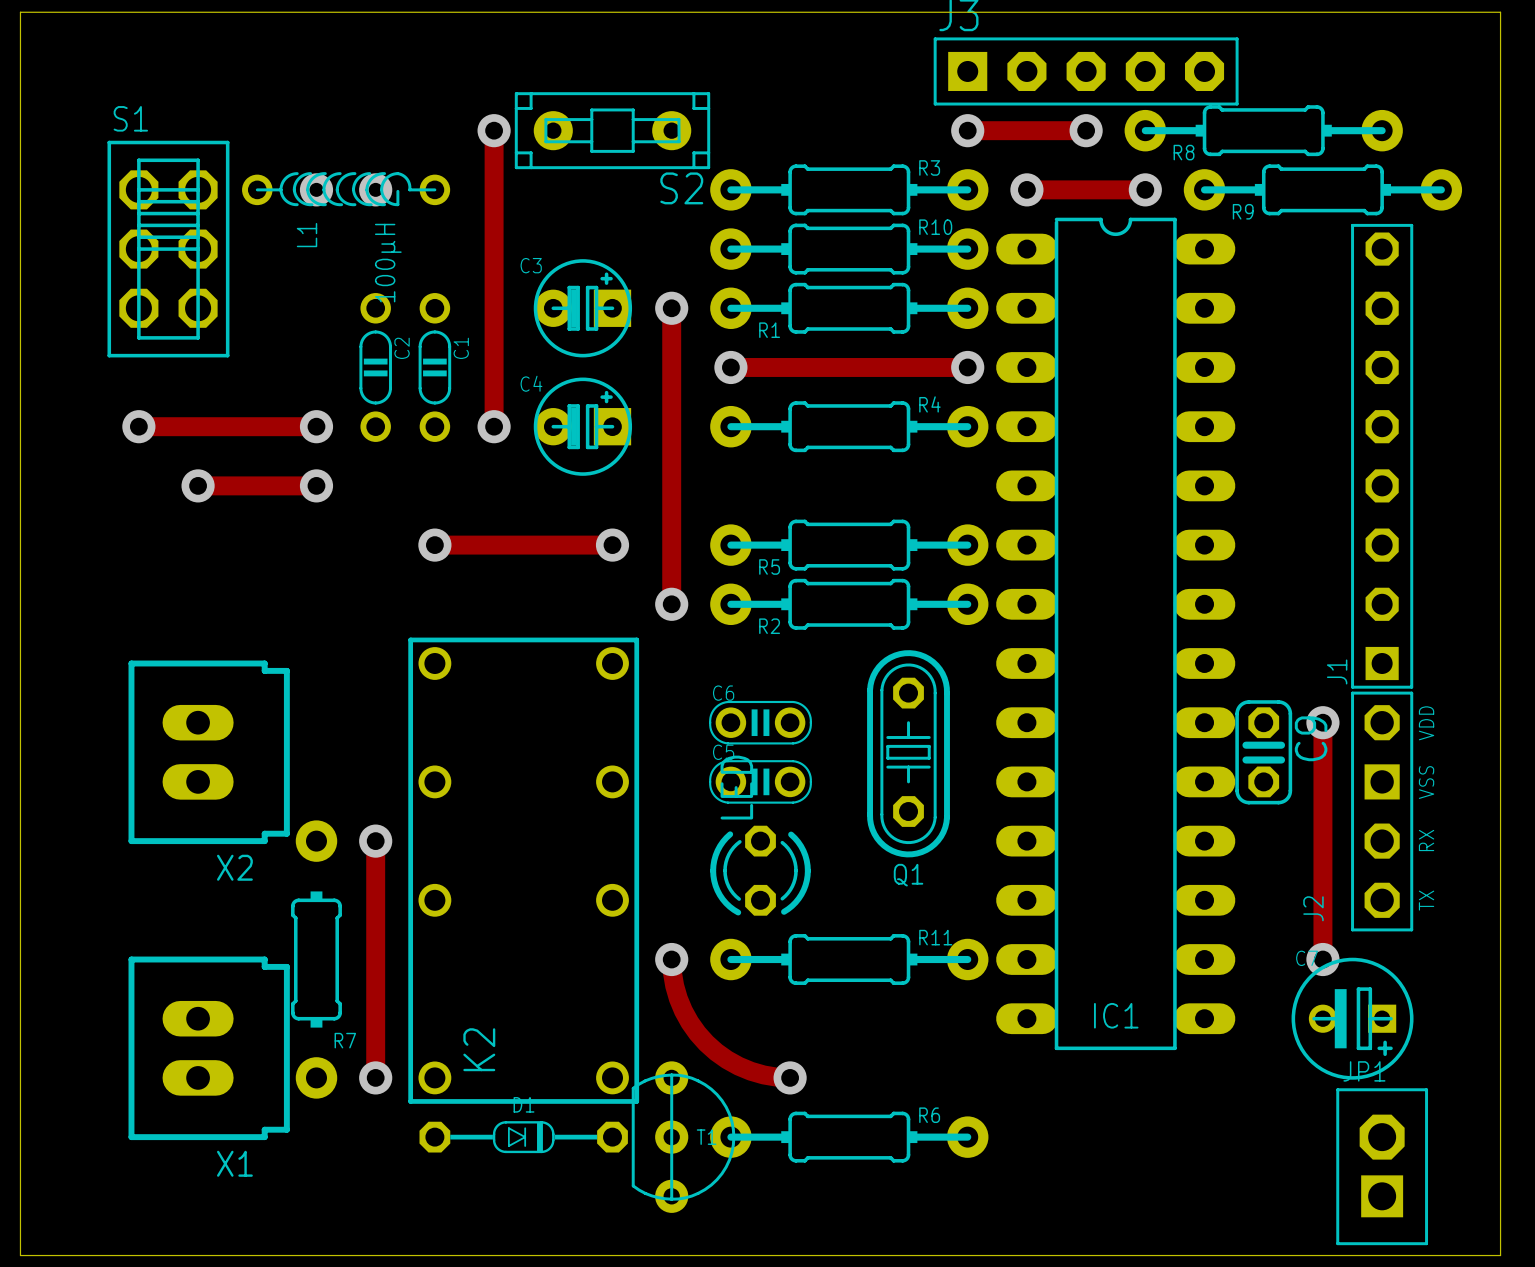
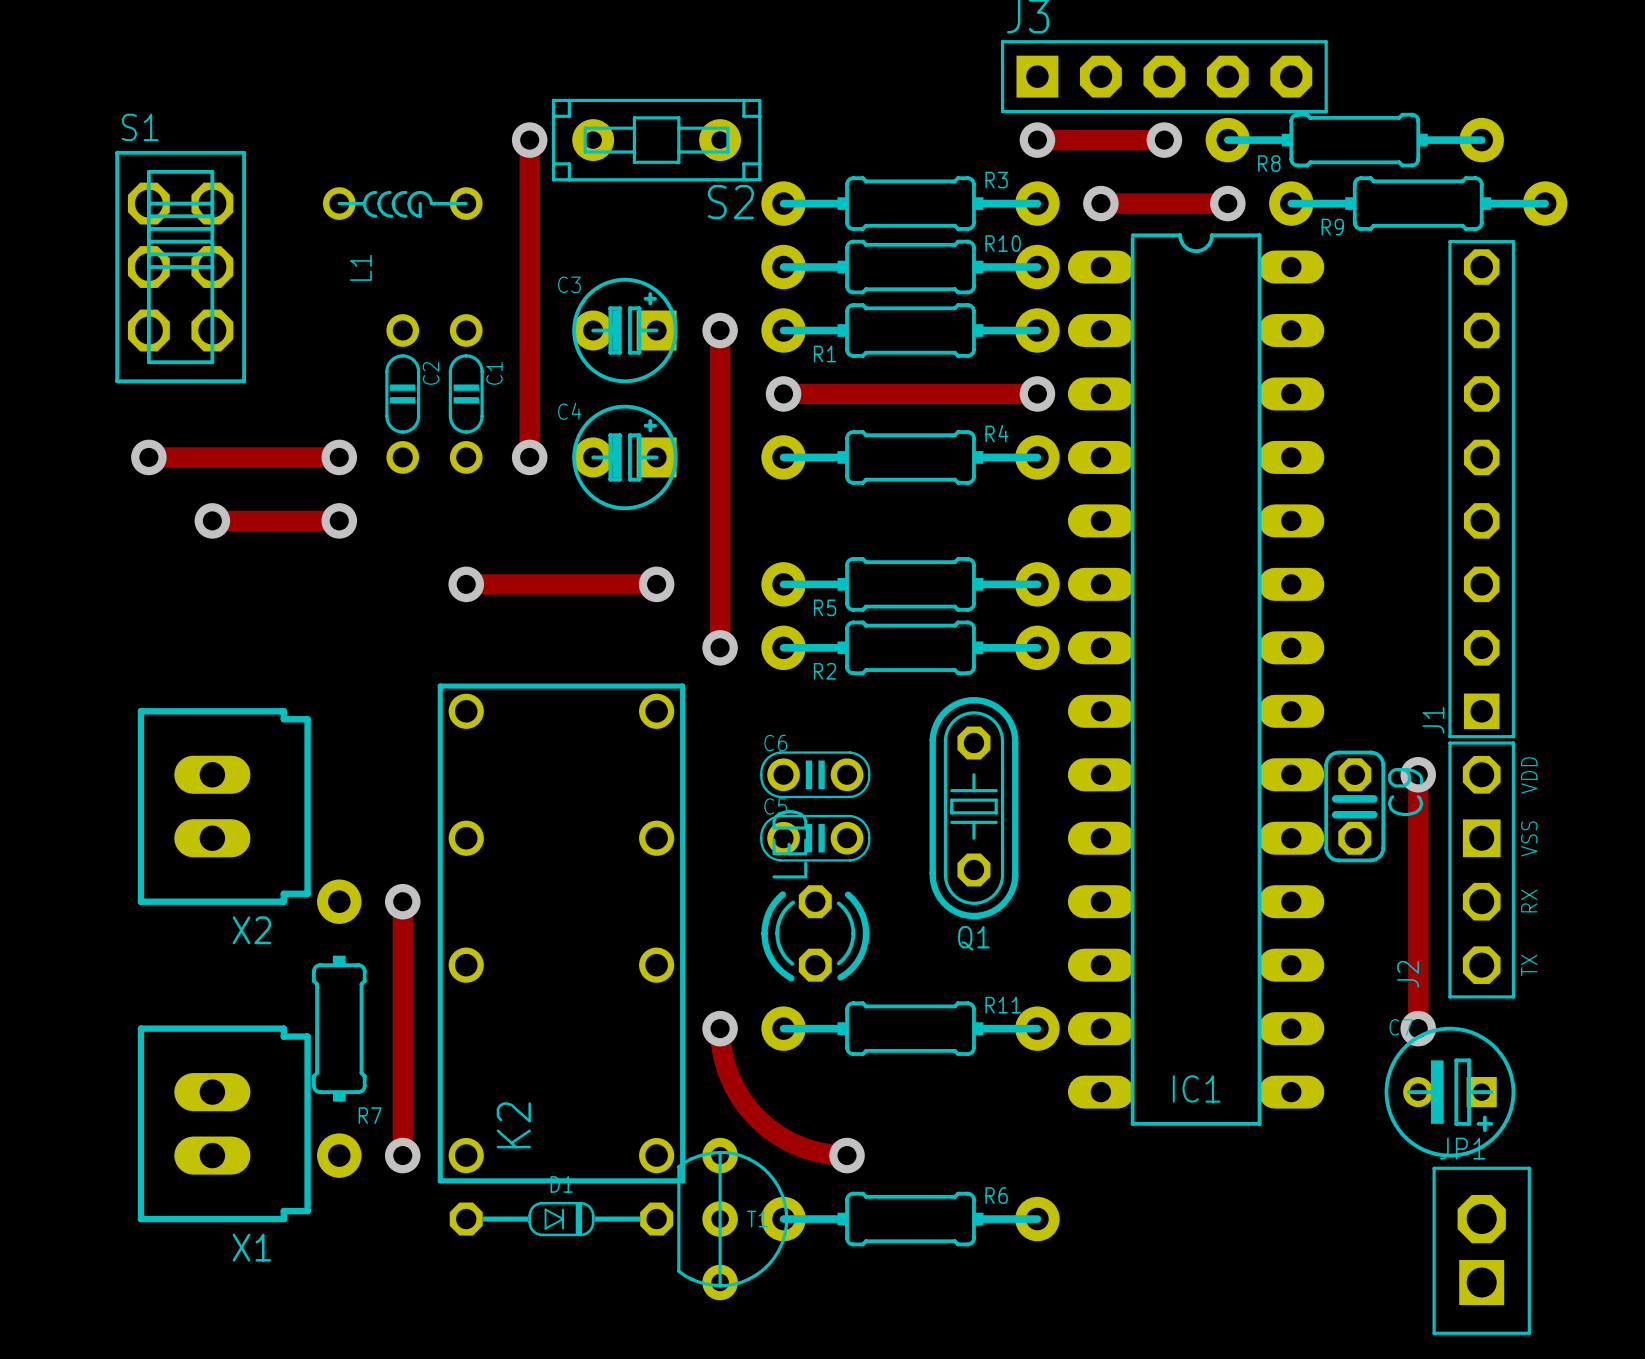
board edge: (20, 12) (20, 1255) (1500, 1255) (1500, 12) (20, 12) -> none
L1 footprint: [242, 172, 451, 207] -> [322, 187, 483, 220]
via: (316, 189) -> none
via: (375, 189) -> none
L1 value: 100µH (388, 263) -> none

